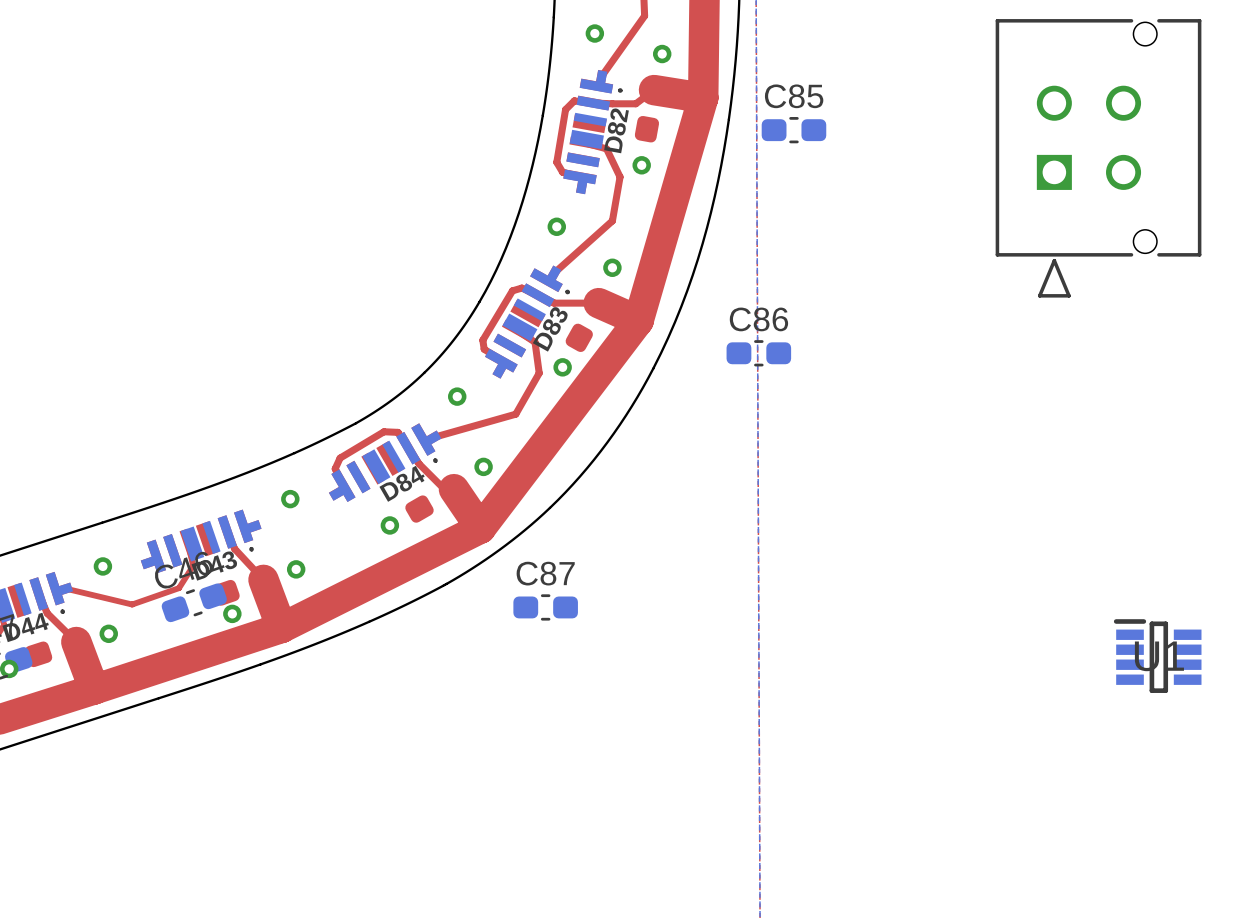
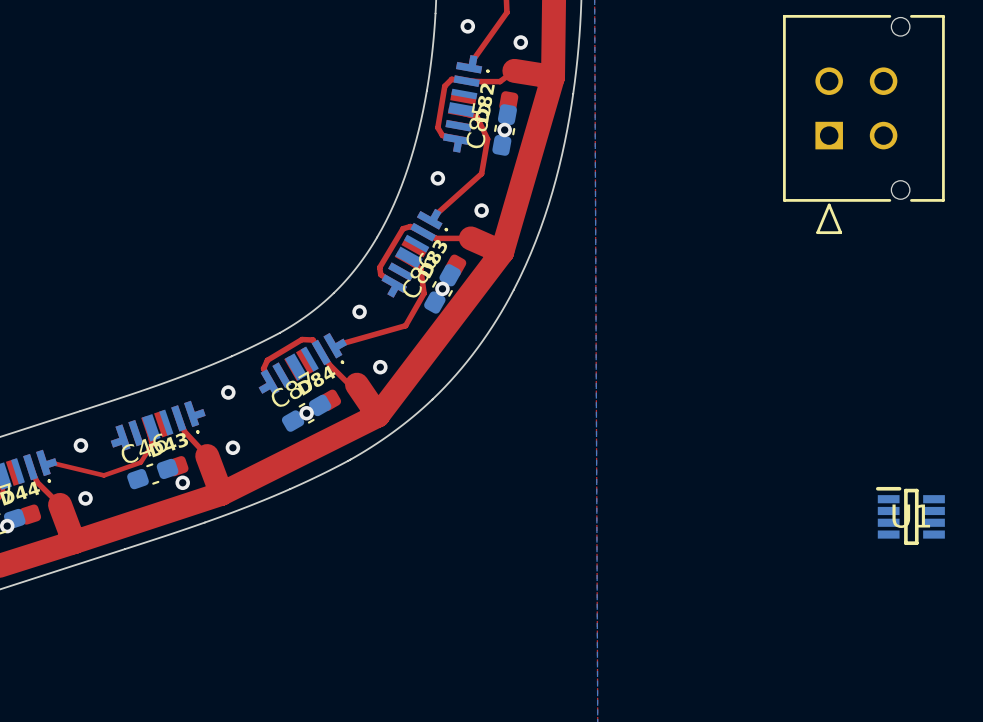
C85 rotation: 0° (793, 130) -> 79.8° counterclockwise (504, 129)
C85 position: (793, 130) -> (504, 129)
C86 rotation: 0° (758, 353) -> 60.8° counterclockwise (442, 288)
C86 position: (758, 353) -> (442, 288)
C87 rotation: 0° (545, 607) -> 30° counterclockwise (306, 413)
C87 position: (545, 607) -> (306, 413)

